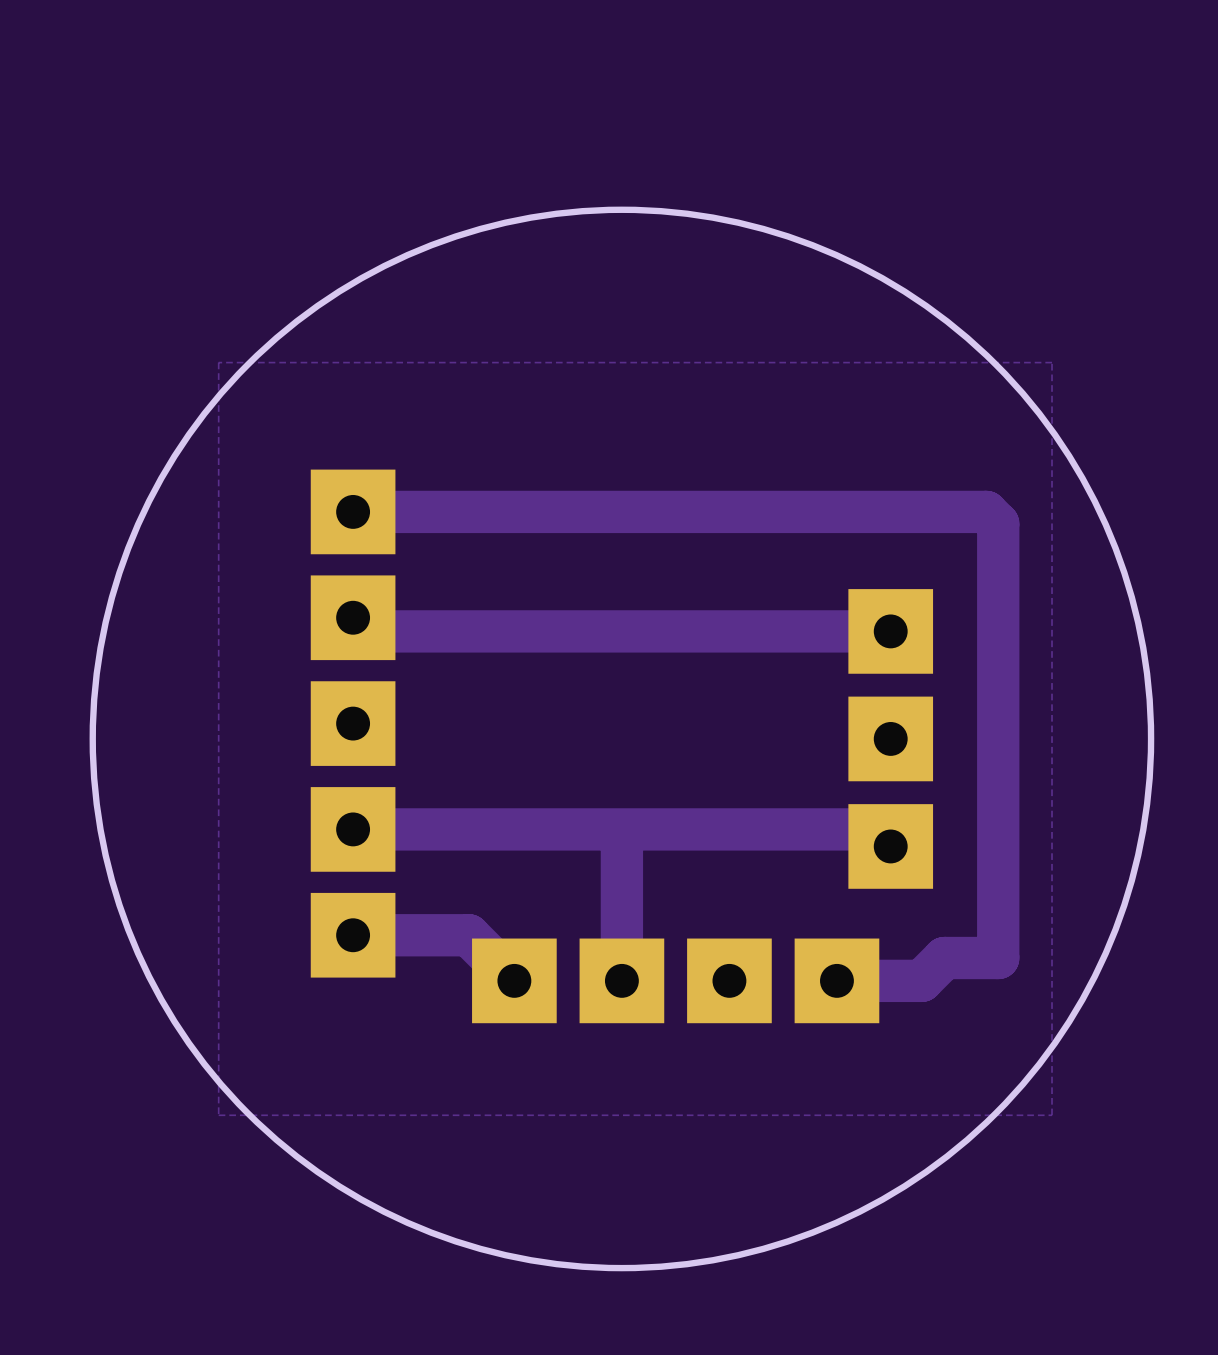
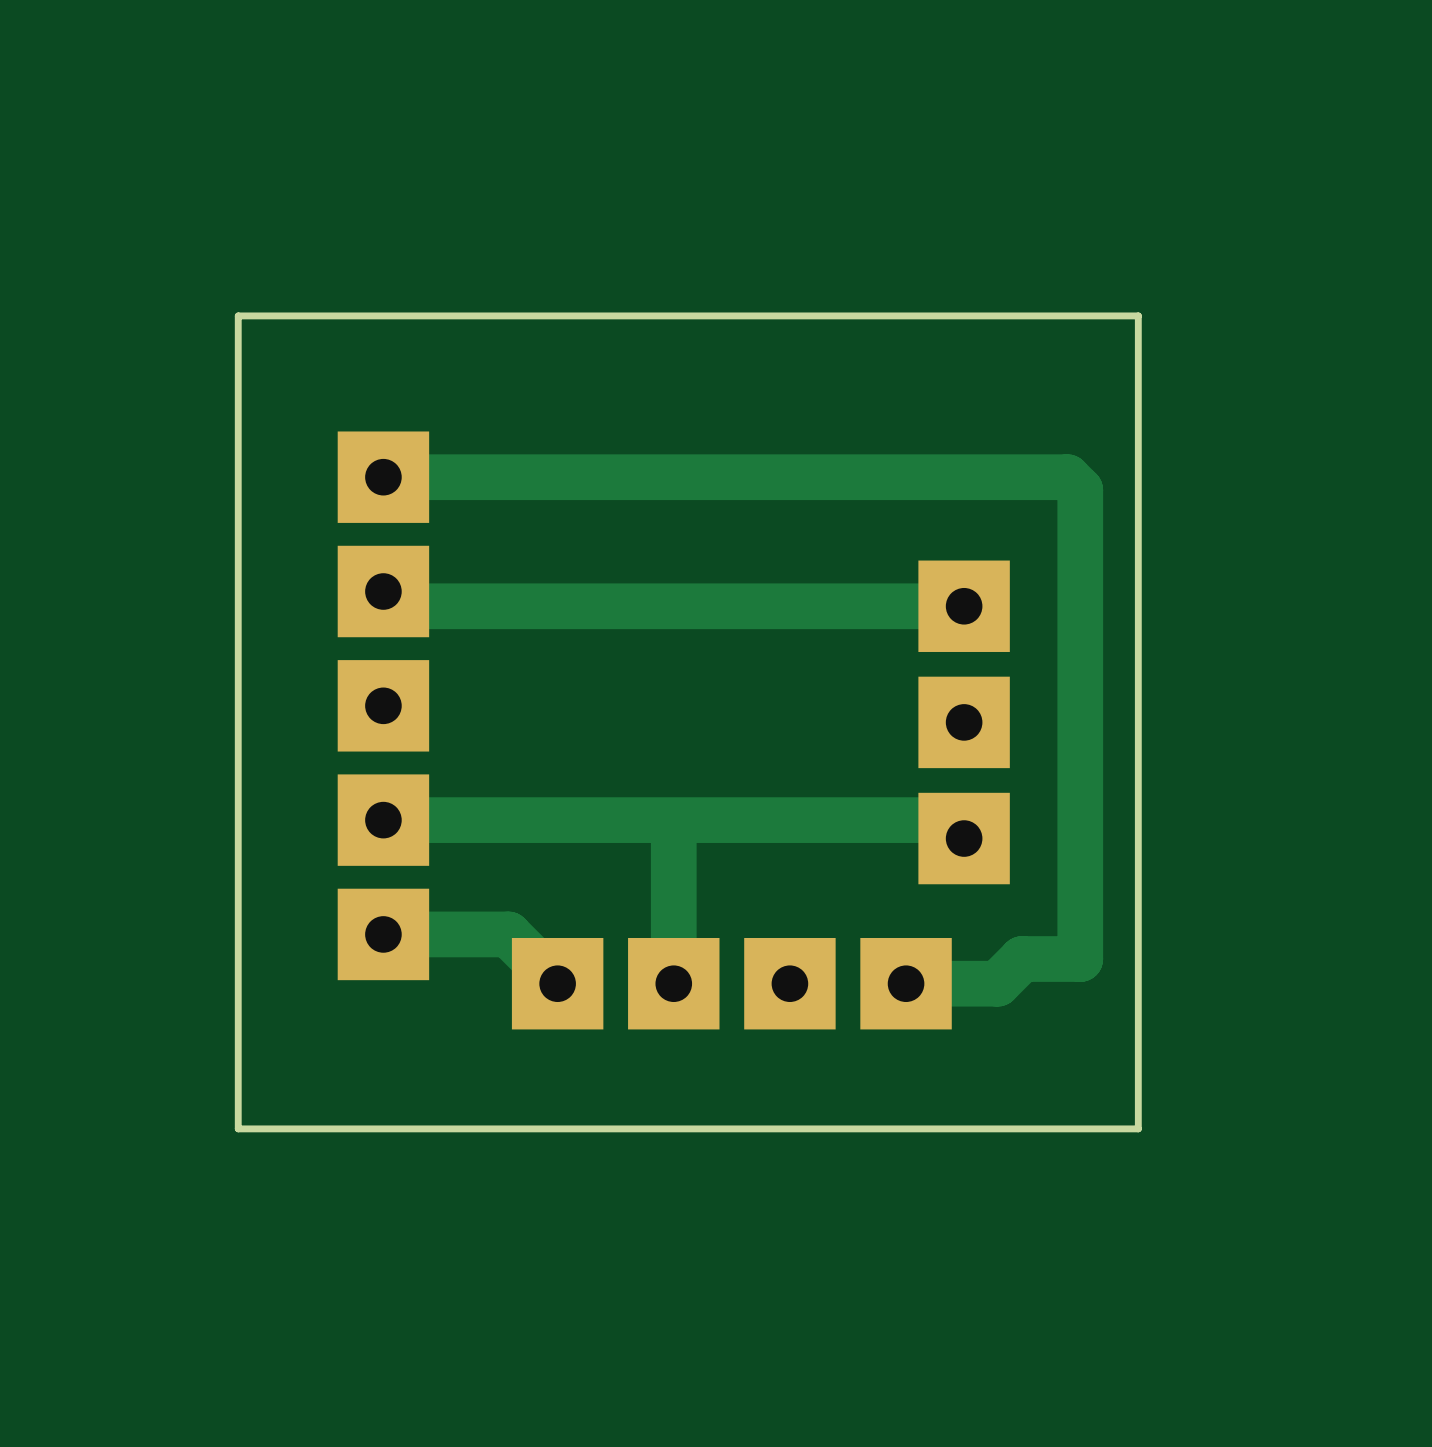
round board edge: [89, 206, 1155, 1272] -> none
board edge: none -> (238, 315) (238, 1128) (1138, 1128) (1138, 315) (238, 315)

